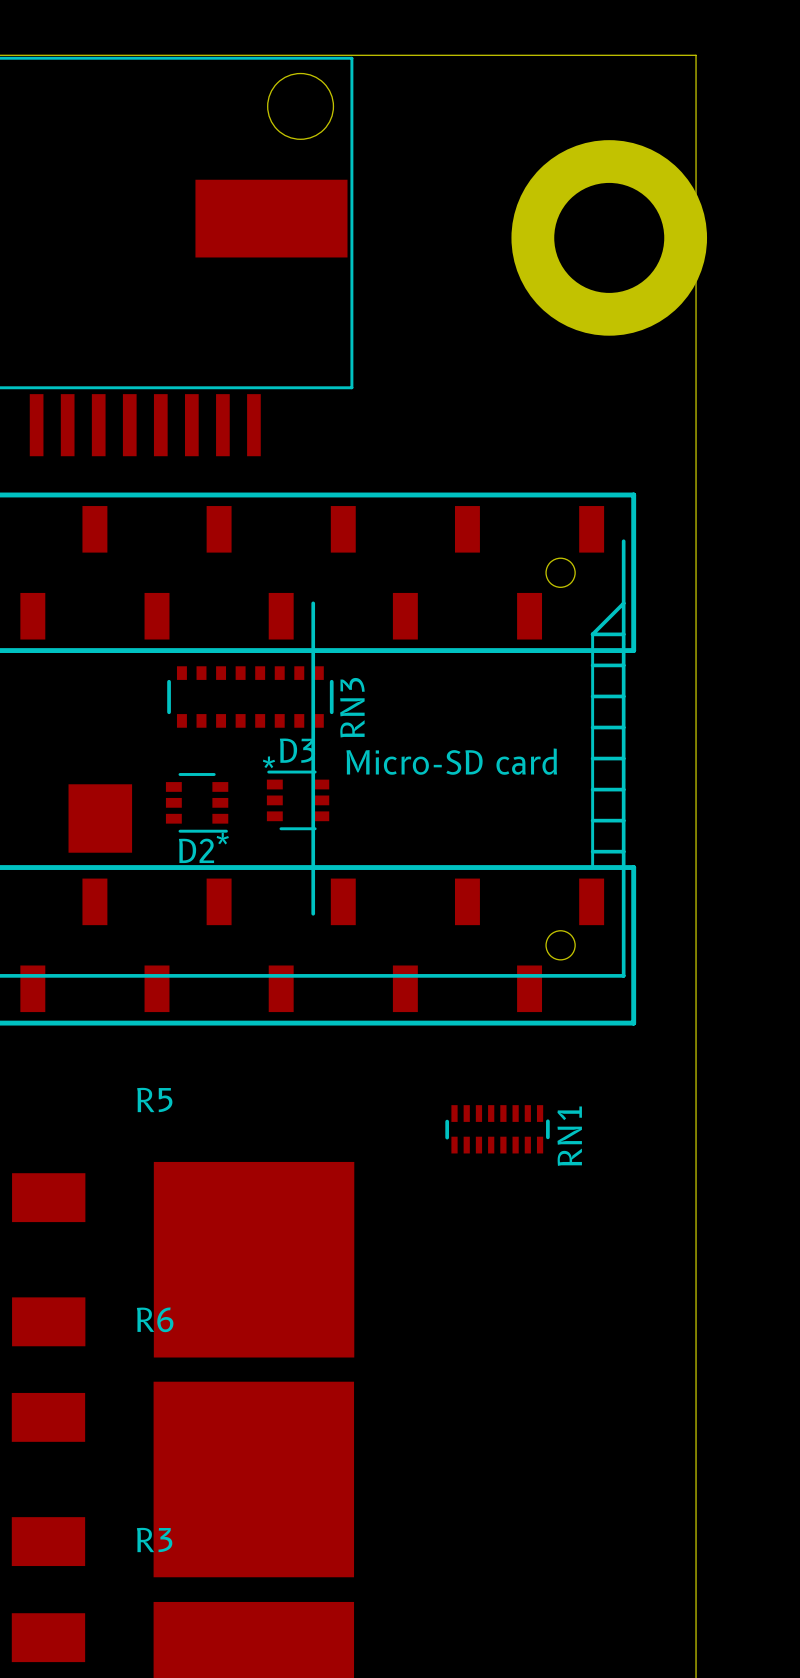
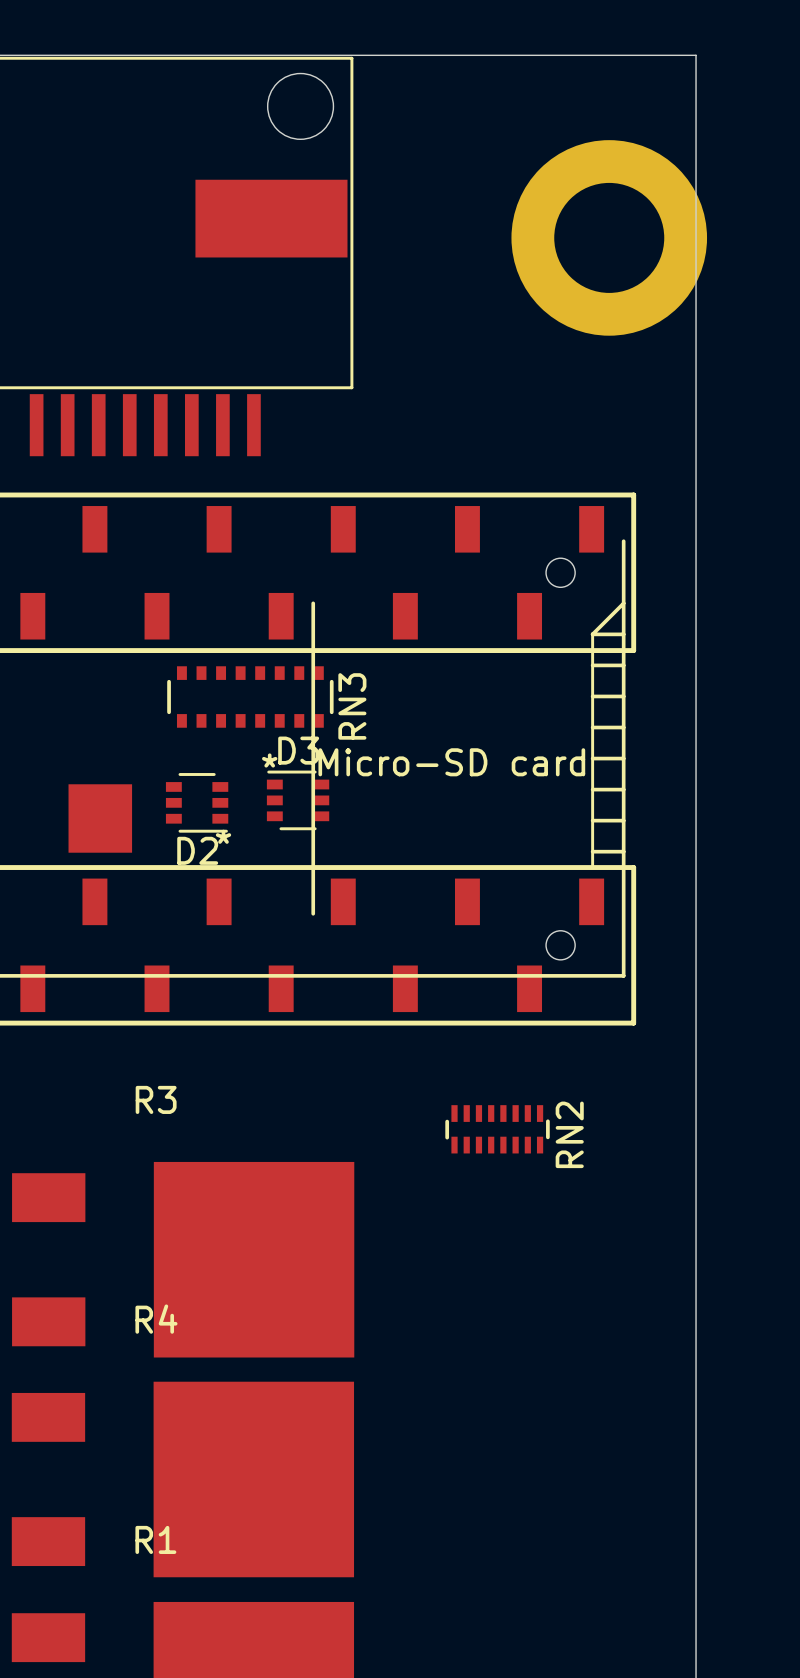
R5 name: R5 (154, 1099) -> R3 (156, 1099)
RN1 name: RN1 (569, 1136) -> RN2 (569, 1134)
R6 name: R6 (155, 1319) -> R4 (156, 1319)
R3 name: R3 (154, 1540) -> R1 (155, 1539)

